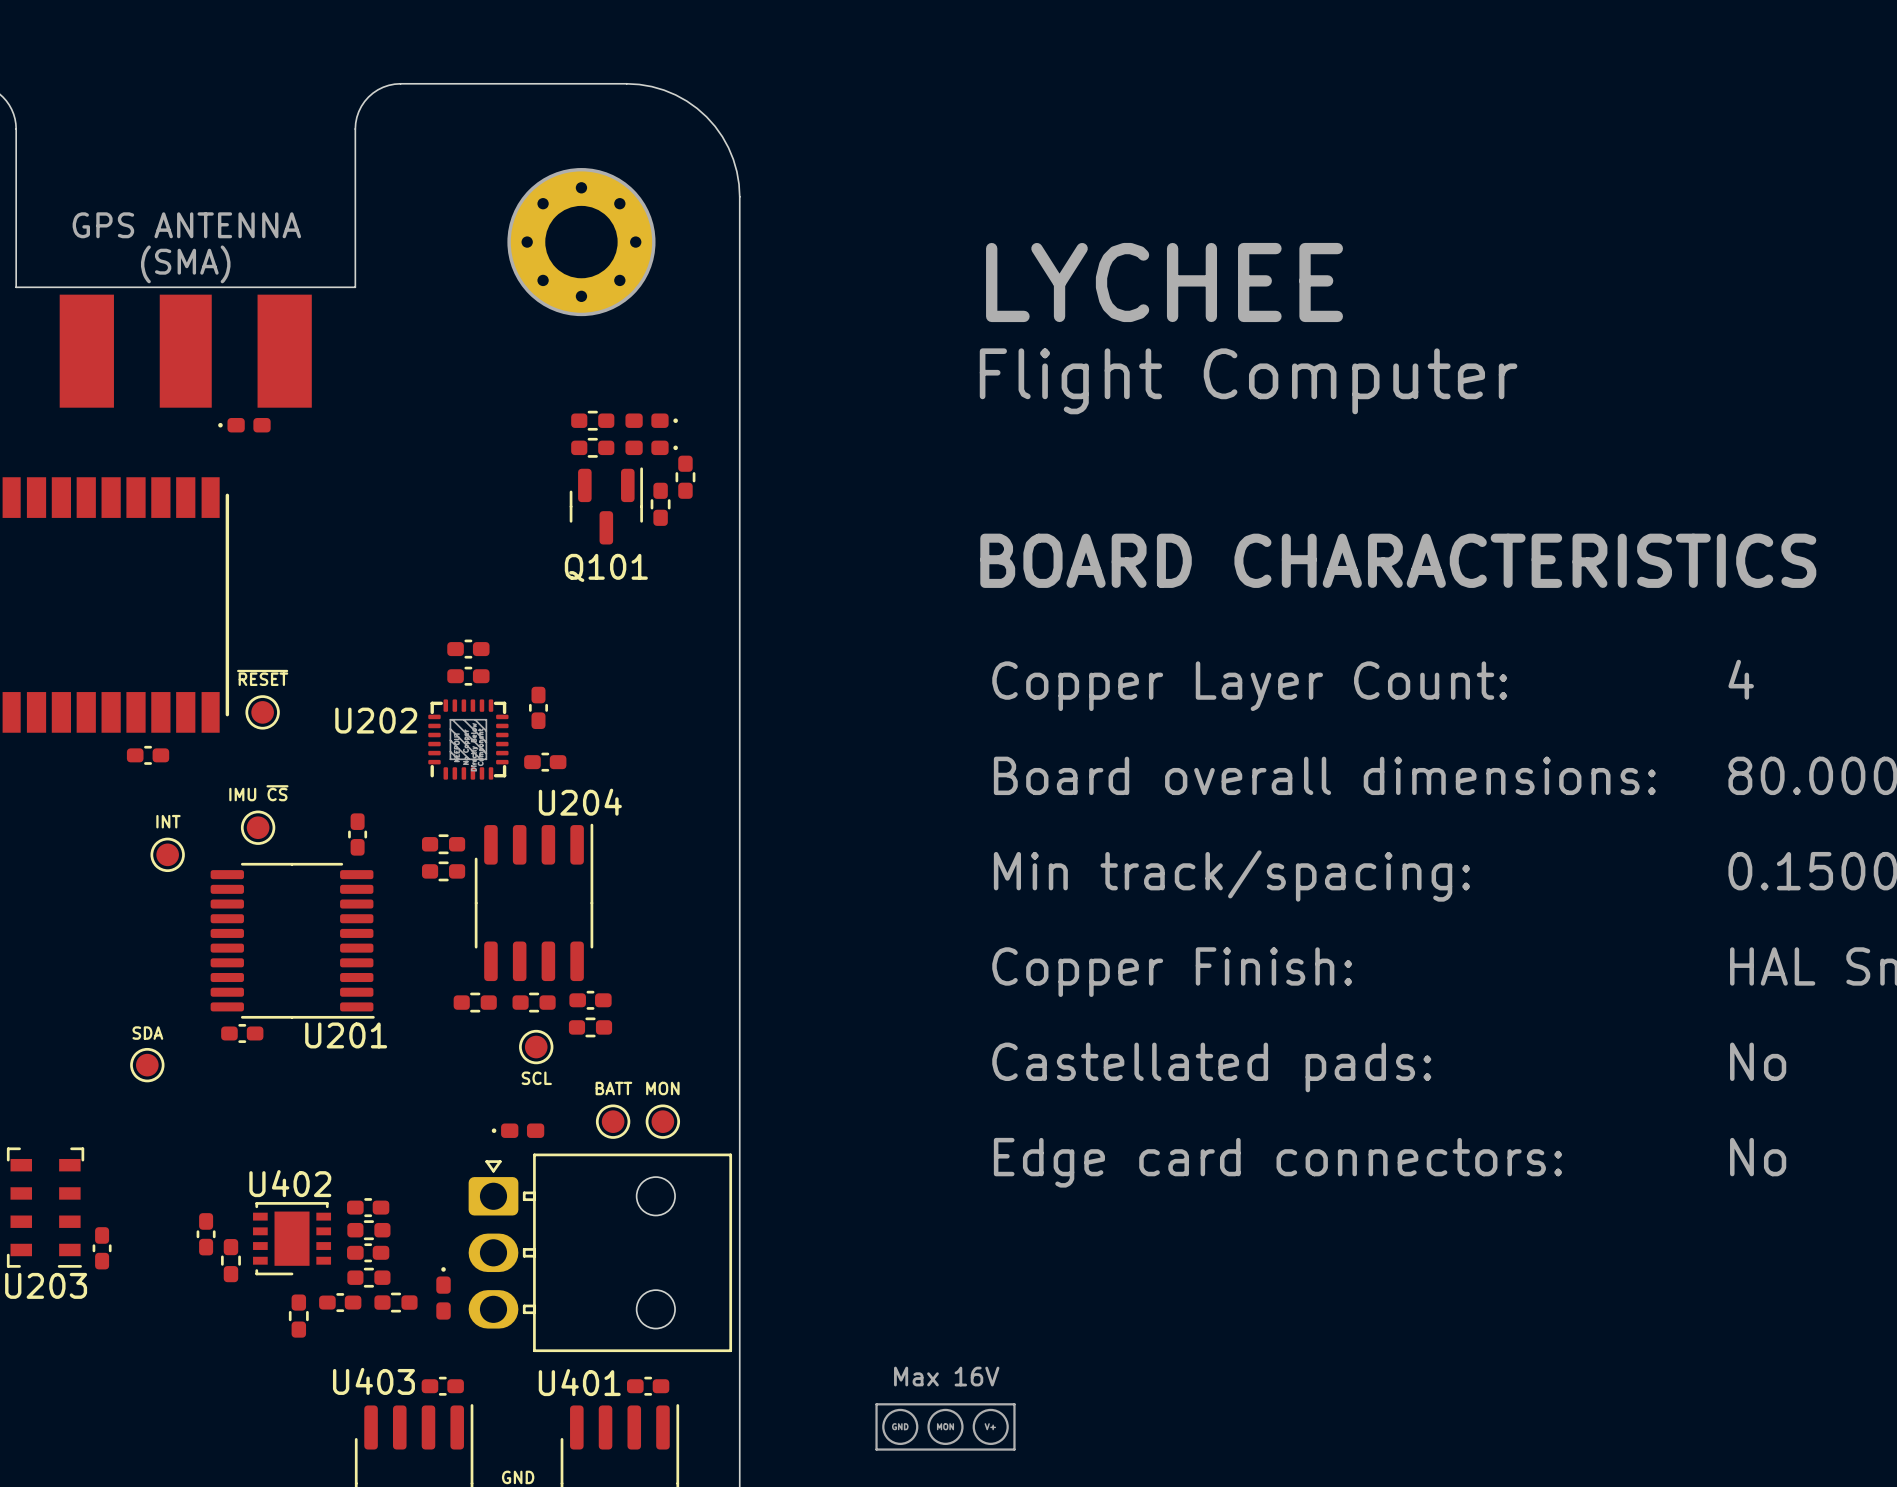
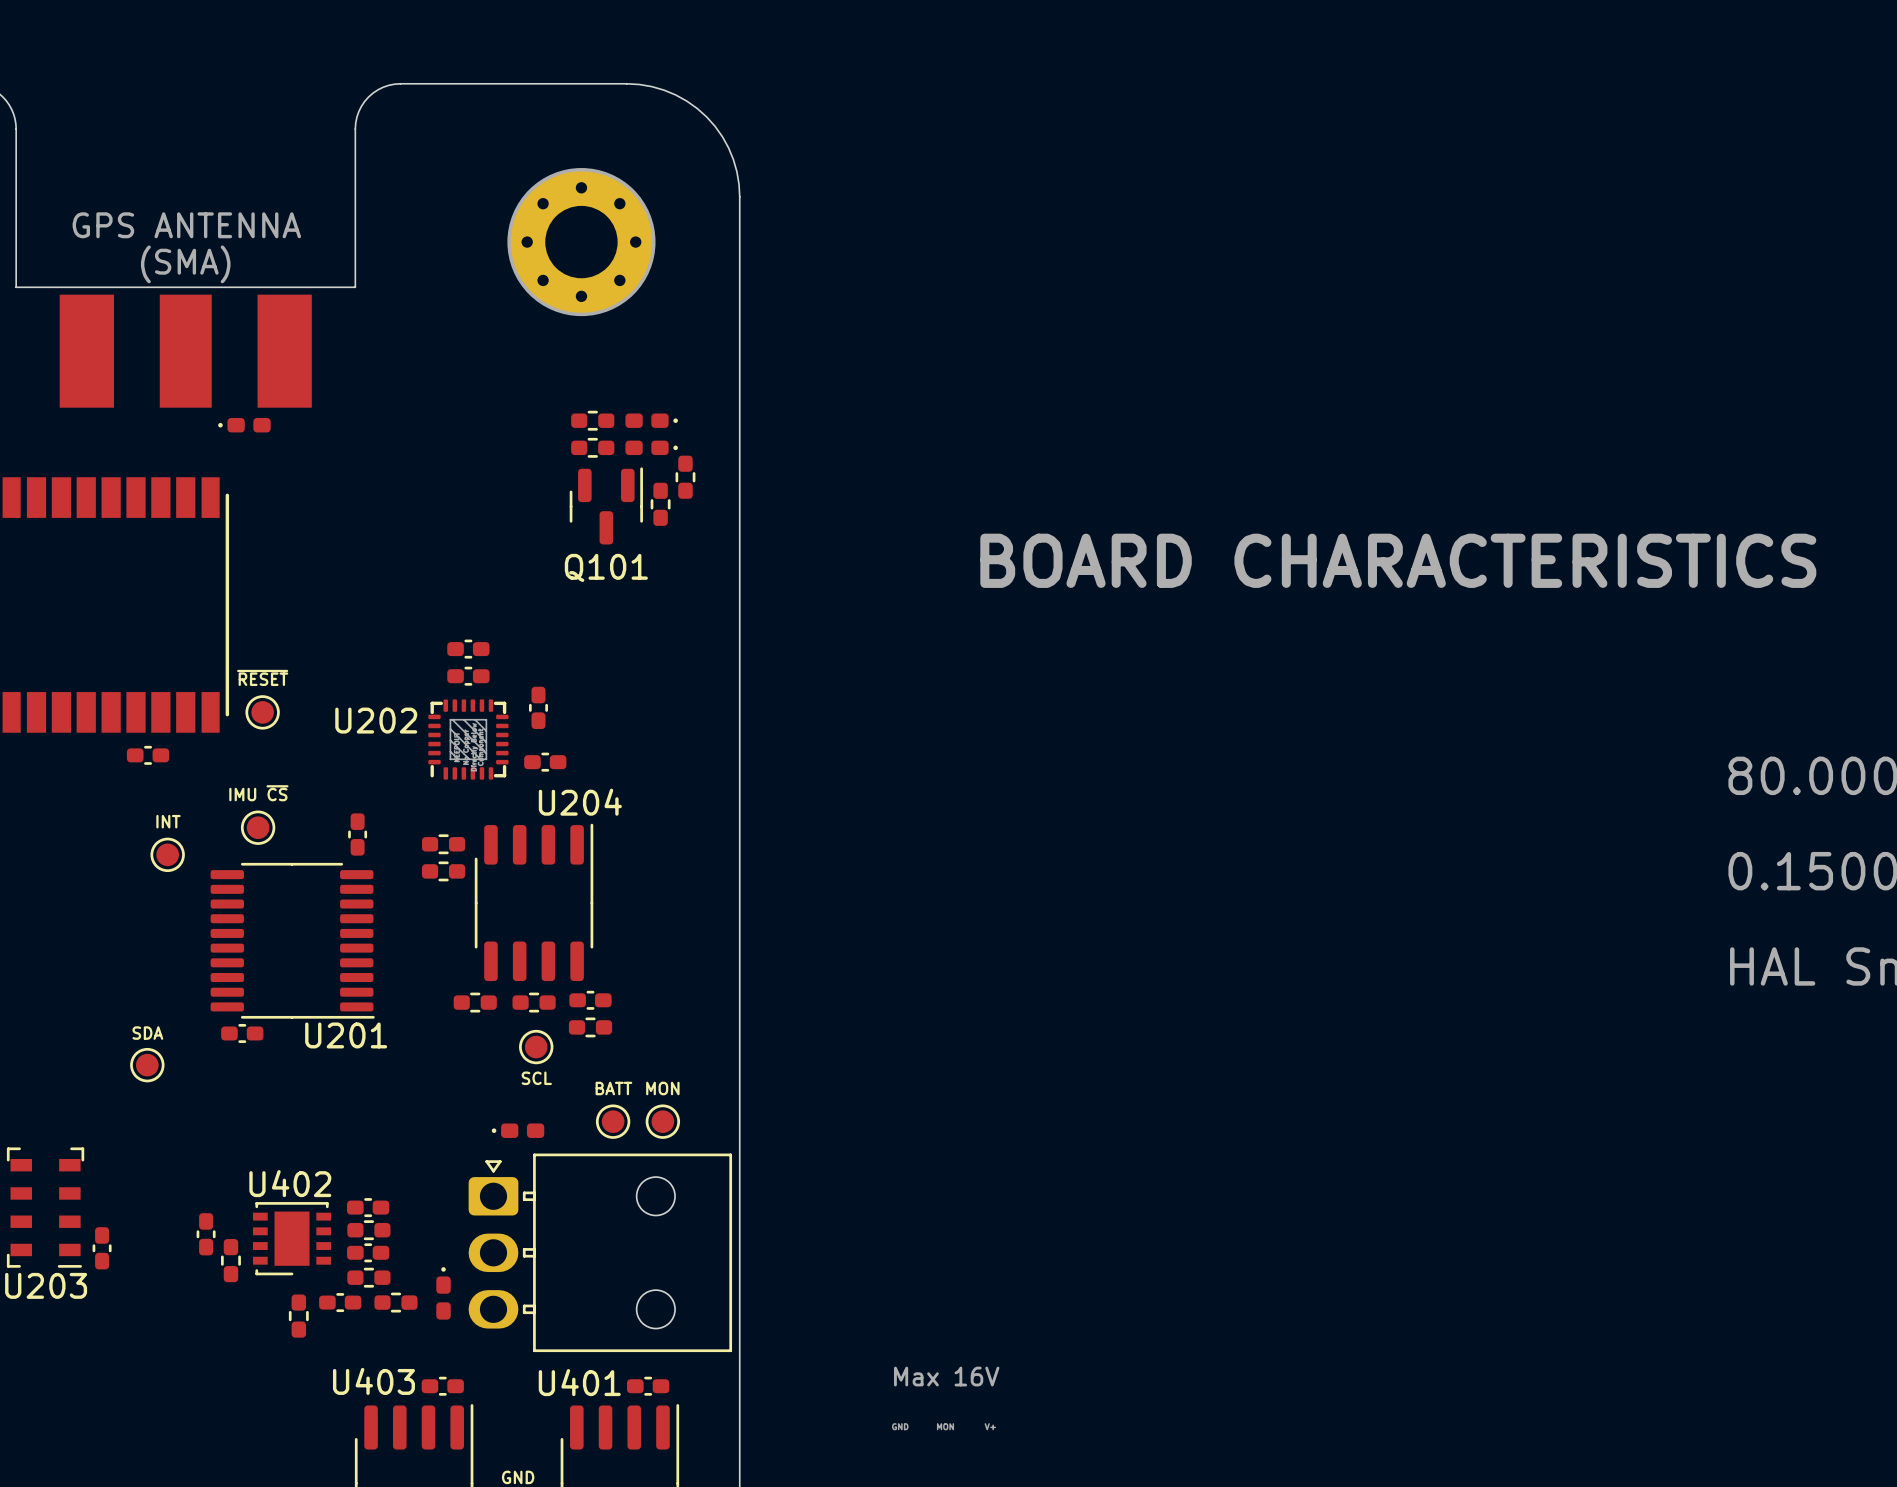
text: LYCHEE (1164, 282) -> none
text: Flight Computer (1248, 381) -> none
text: 4 (1741, 679) -> none
text: Copper Layer Count: (1249, 686) -> none
text: Board overall dimensions: (1324, 775) -> none
text: Min track/spacing: (1231, 876) -> none
text: Copper Finish: (1172, 972) -> none
text: No (1758, 1061) -> none
text: Castellated pads: (1211, 1067) -> none
text: No (1758, 1157) -> none
text: Edge card connectors: (1277, 1162) -> none
line: (876, 1404) (1014, 1404) (1014, 1449) (876, 1449) (876, 1404) -> none
drawing: [882, 1408, 1009, 1446] -> none

